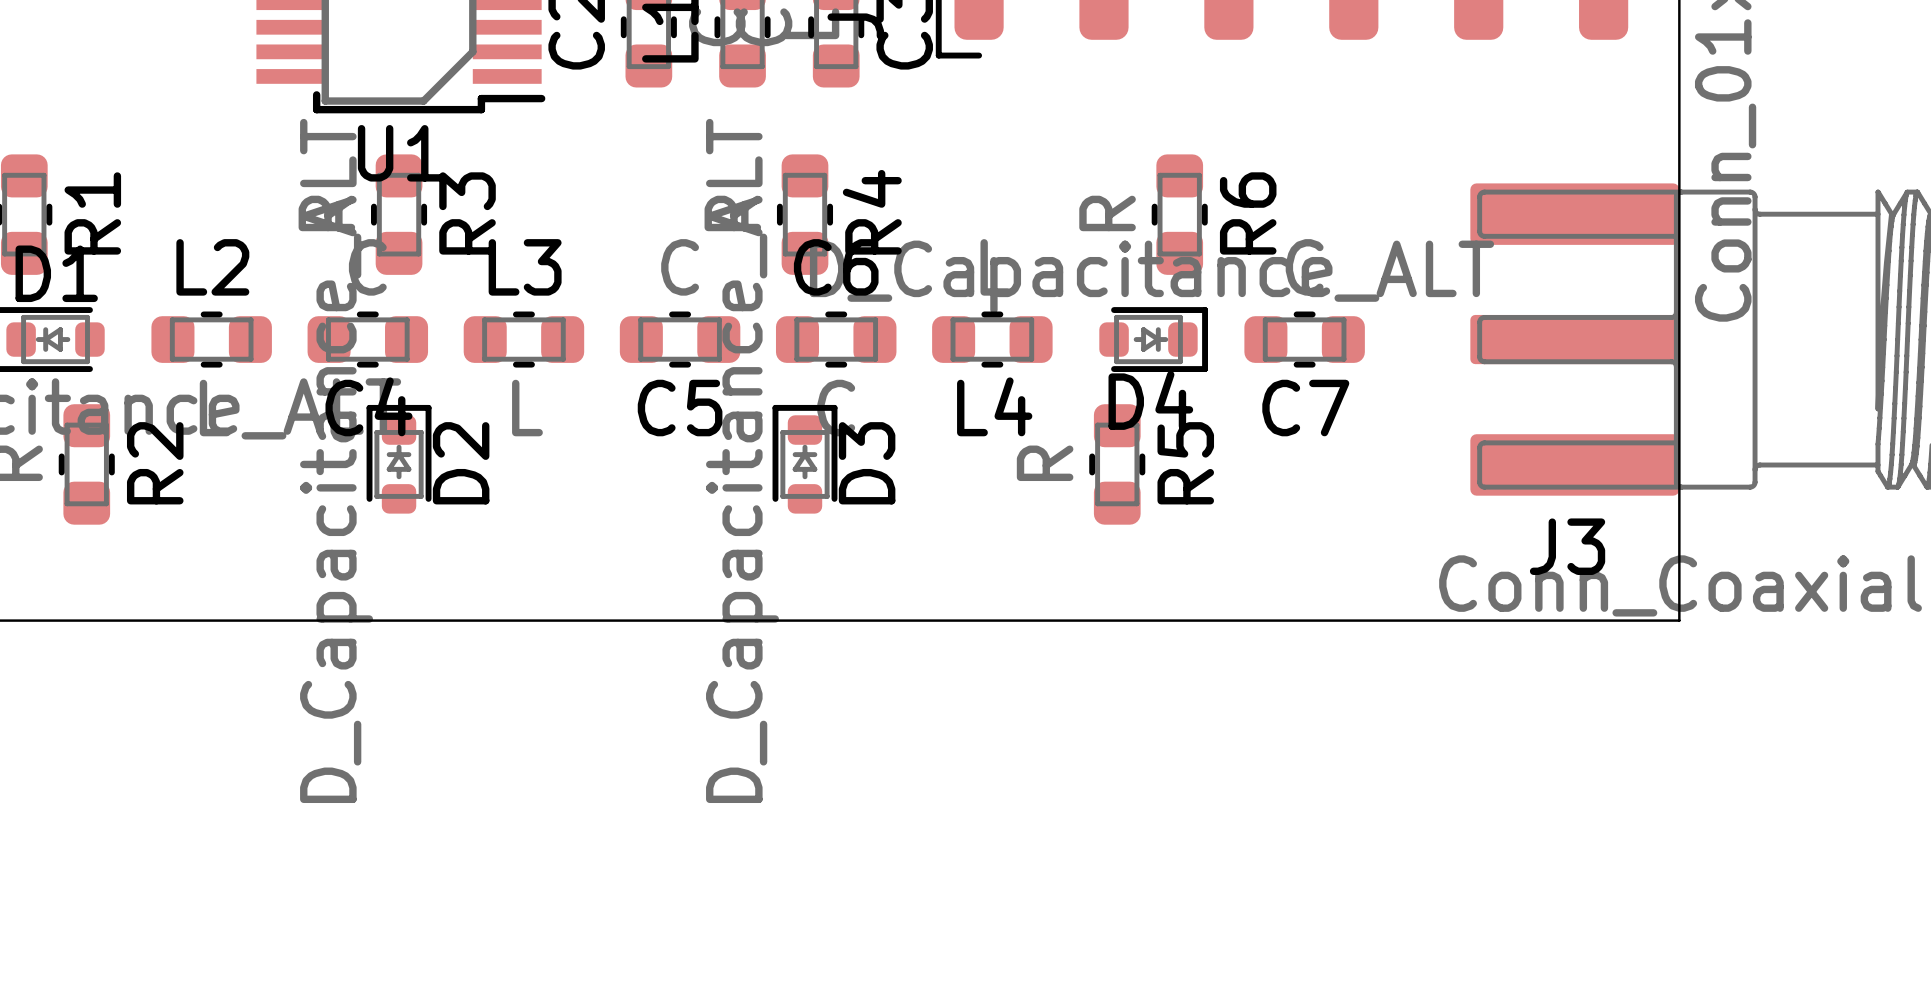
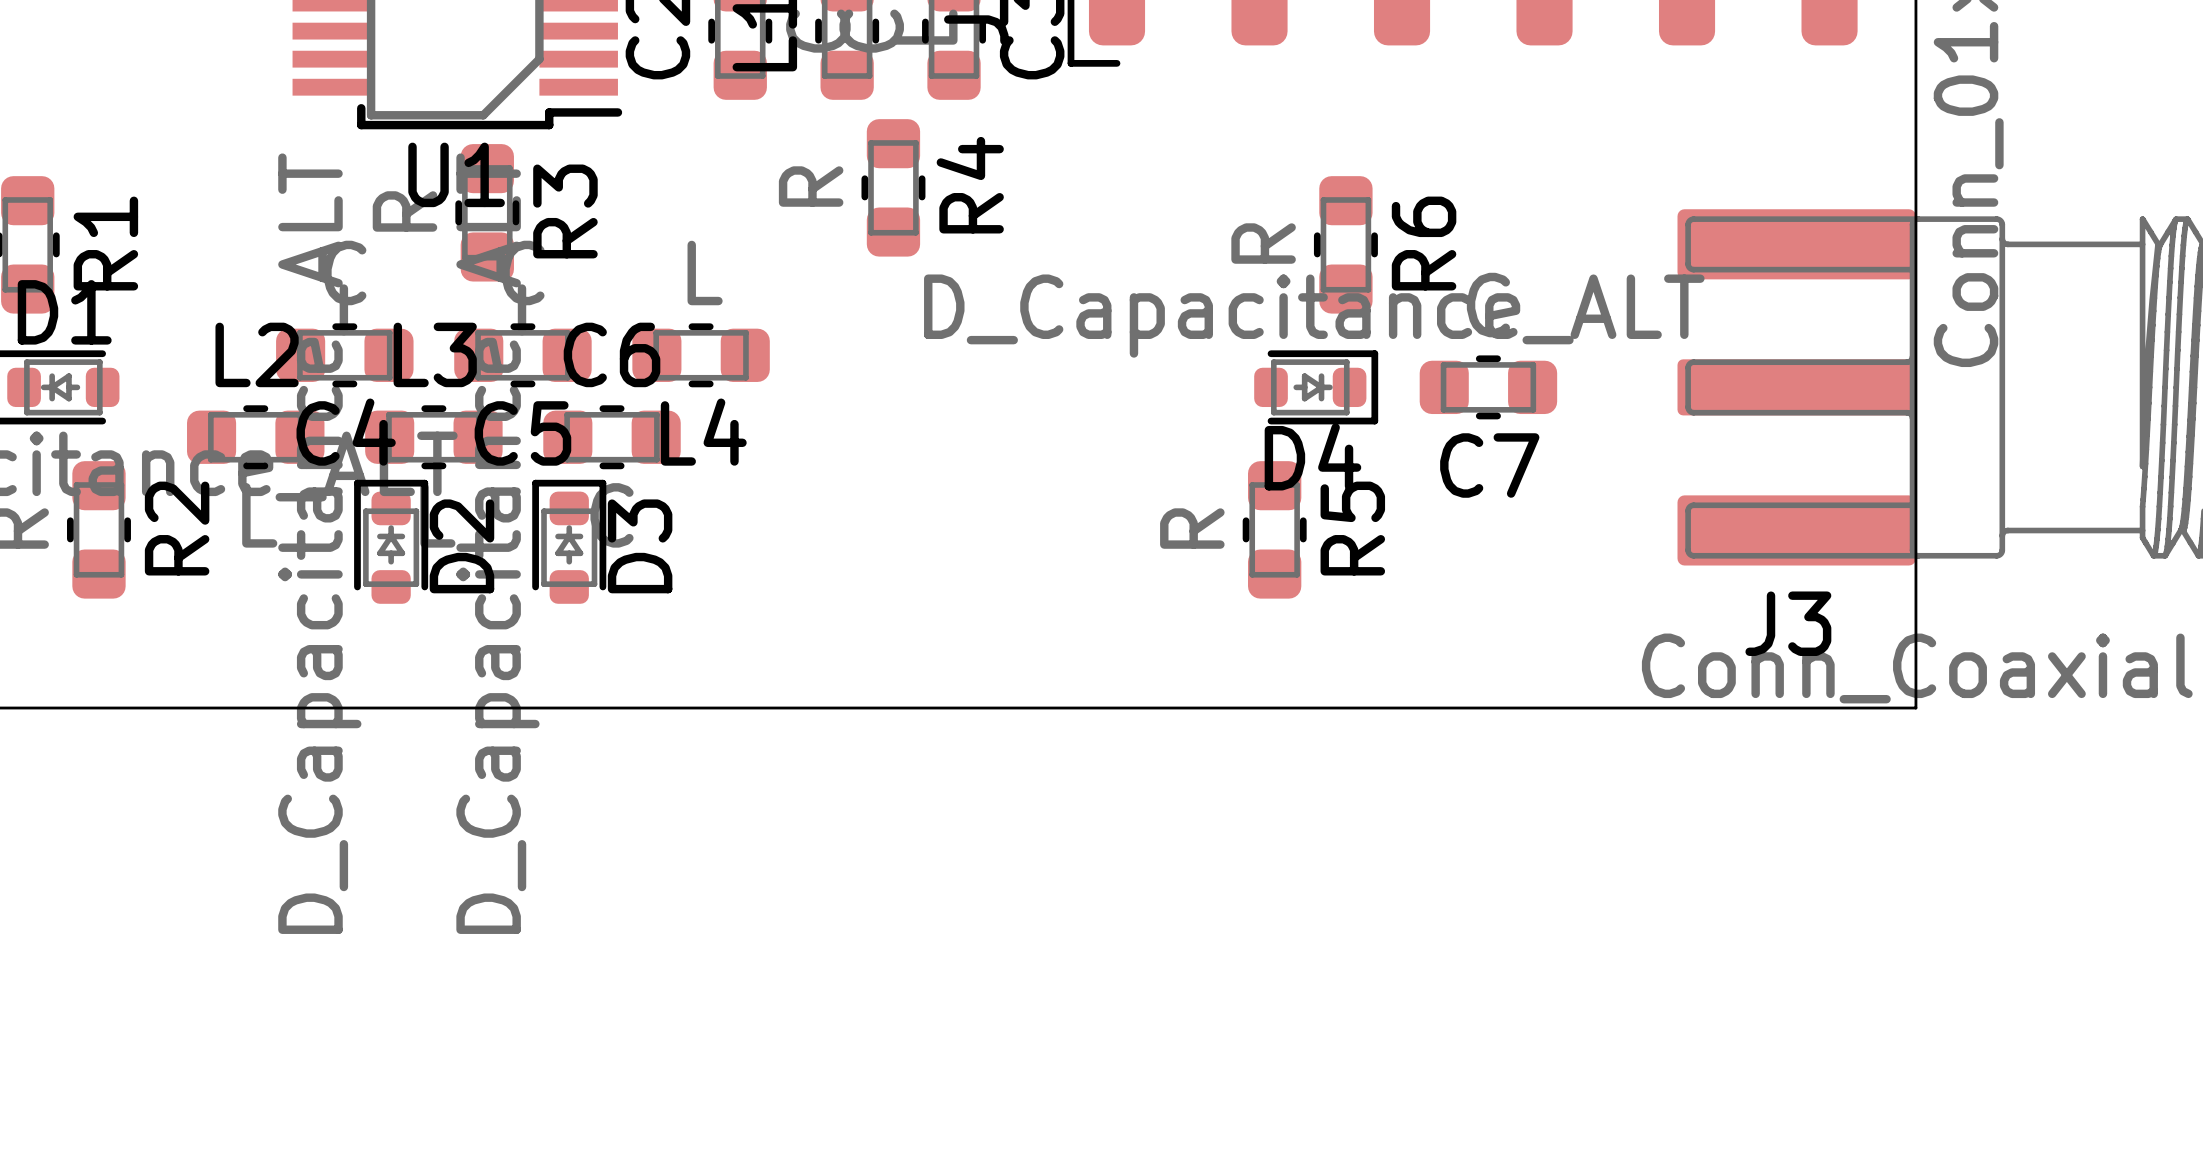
R3 position: (399, 214) -> (487, 212)
R4 position: (804, 214) -> (893, 187)
L2 position: (211, 339) -> (255, 437)
C4 position: (367, 339) -> (344, 355)
L3 position: (523, 339) -> (433, 437)
C5 position: (680, 339) -> (522, 355)
C6 position: (836, 339) -> (612, 437)
L4 position: (992, 339) -> (701, 355)
D2 position: (399, 459) -> (391, 541)
D3 position: (804, 459) -> (569, 541)

